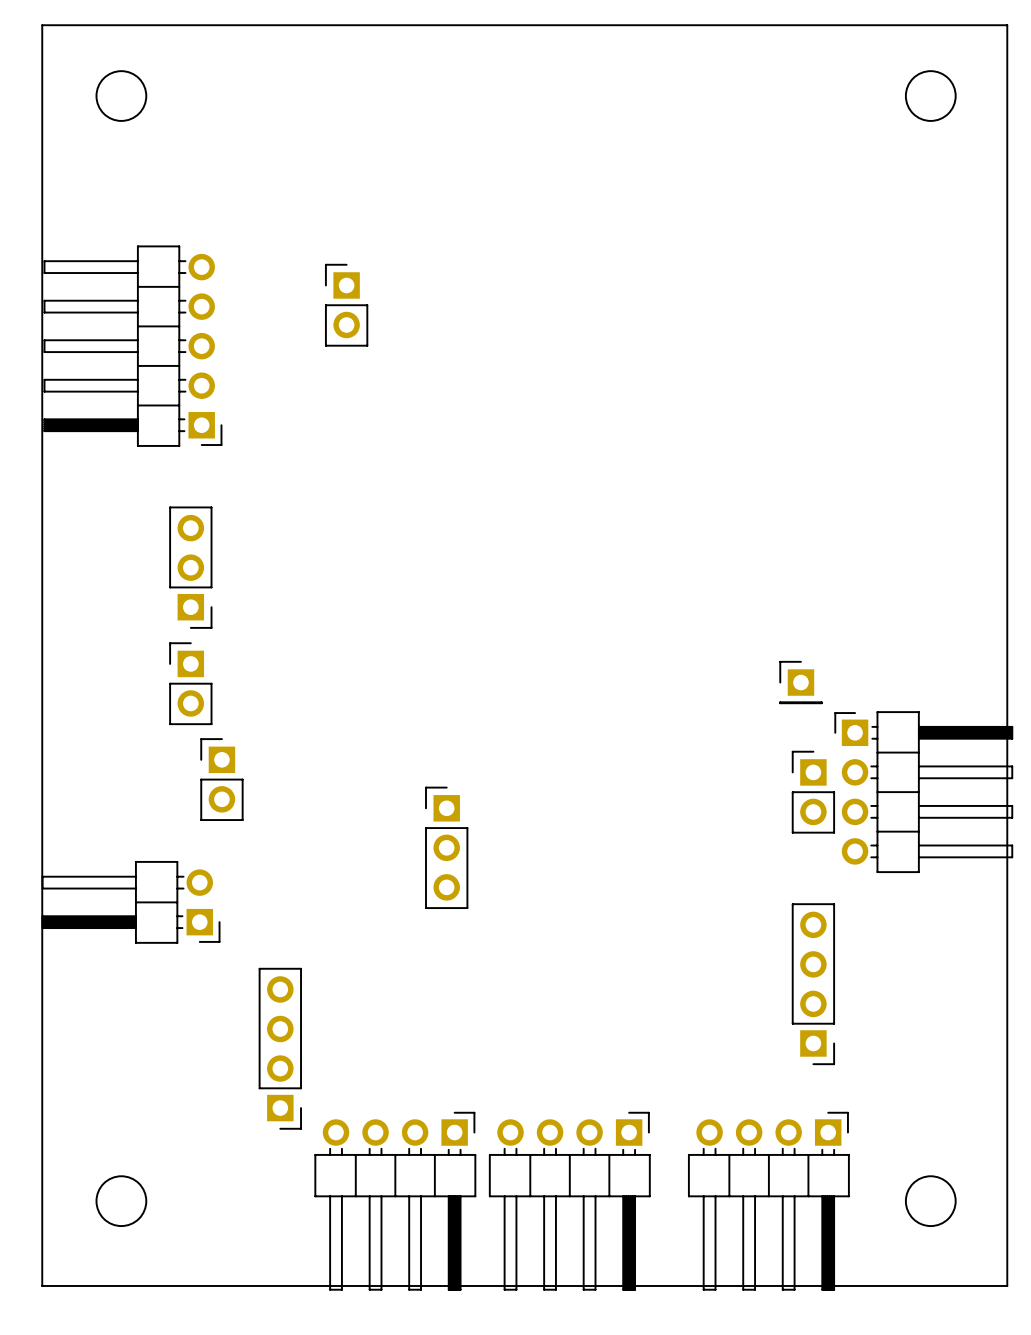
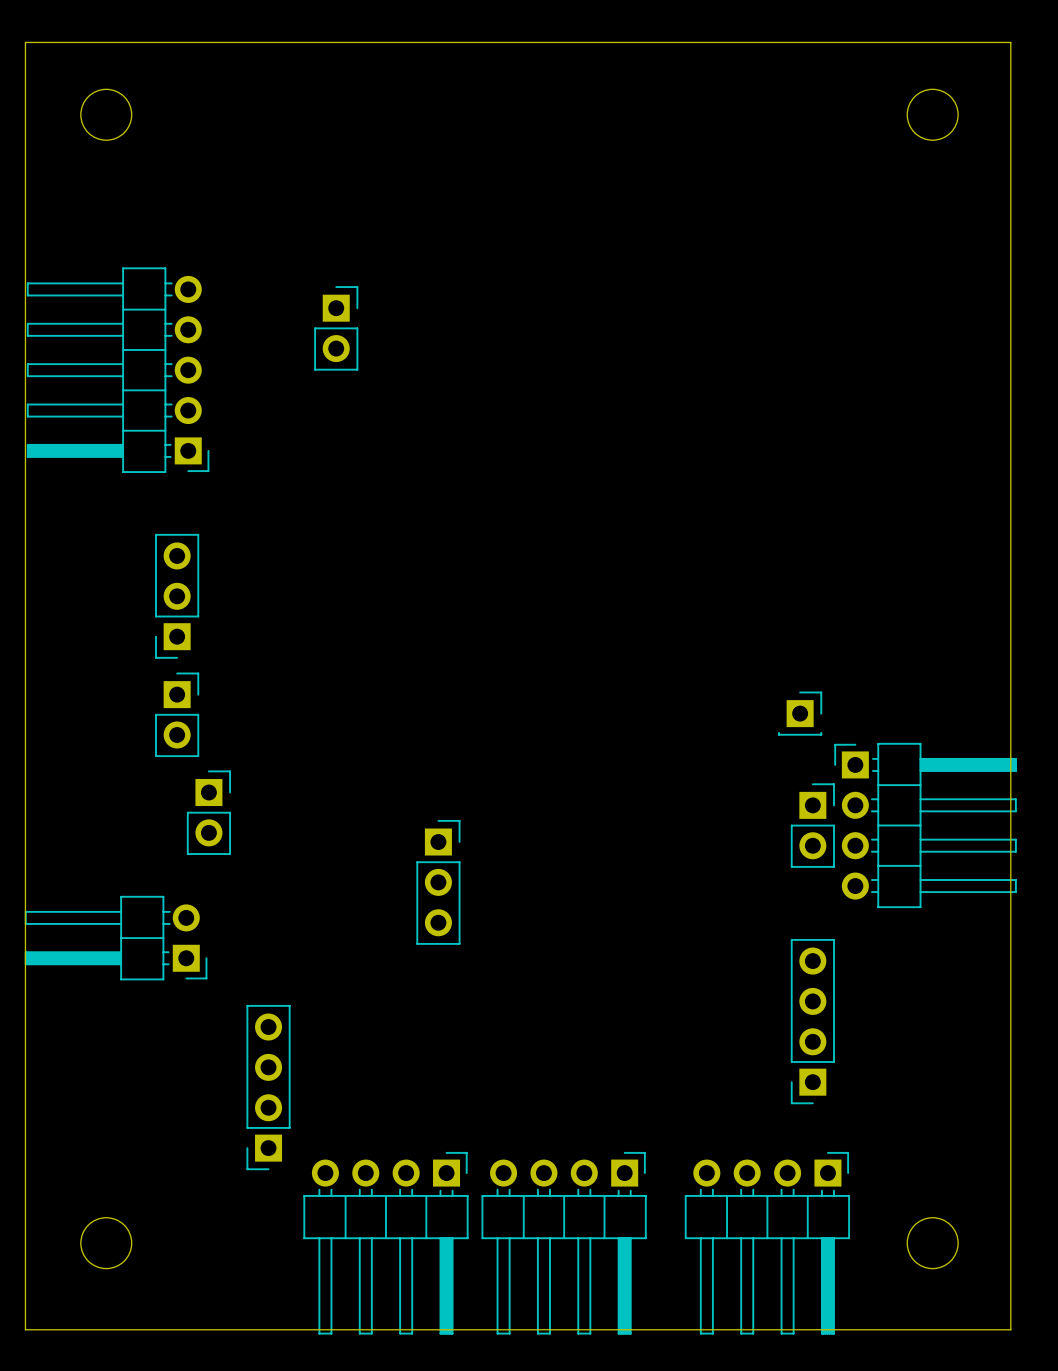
part footprint: [324, 263, 369, 347] -> [314, 286, 359, 371]
part footprint: [169, 506, 213, 629] -> [155, 533, 200, 659]
part footprint: [169, 642, 213, 726] -> [155, 672, 200, 758]
part footprint: [779, 660, 823, 705] -> [778, 691, 823, 736]
part footprint: [200, 738, 244, 821] -> [186, 770, 232, 855]
part footprint: [791, 750, 836, 834] -> [790, 783, 835, 868]
part footprint: [425, 786, 469, 910] -> [416, 819, 461, 945]
part footprint: [791, 903, 836, 1066] -> [790, 938, 835, 1105]
part footprint: [258, 967, 302, 1130] -> [246, 1004, 291, 1171]

